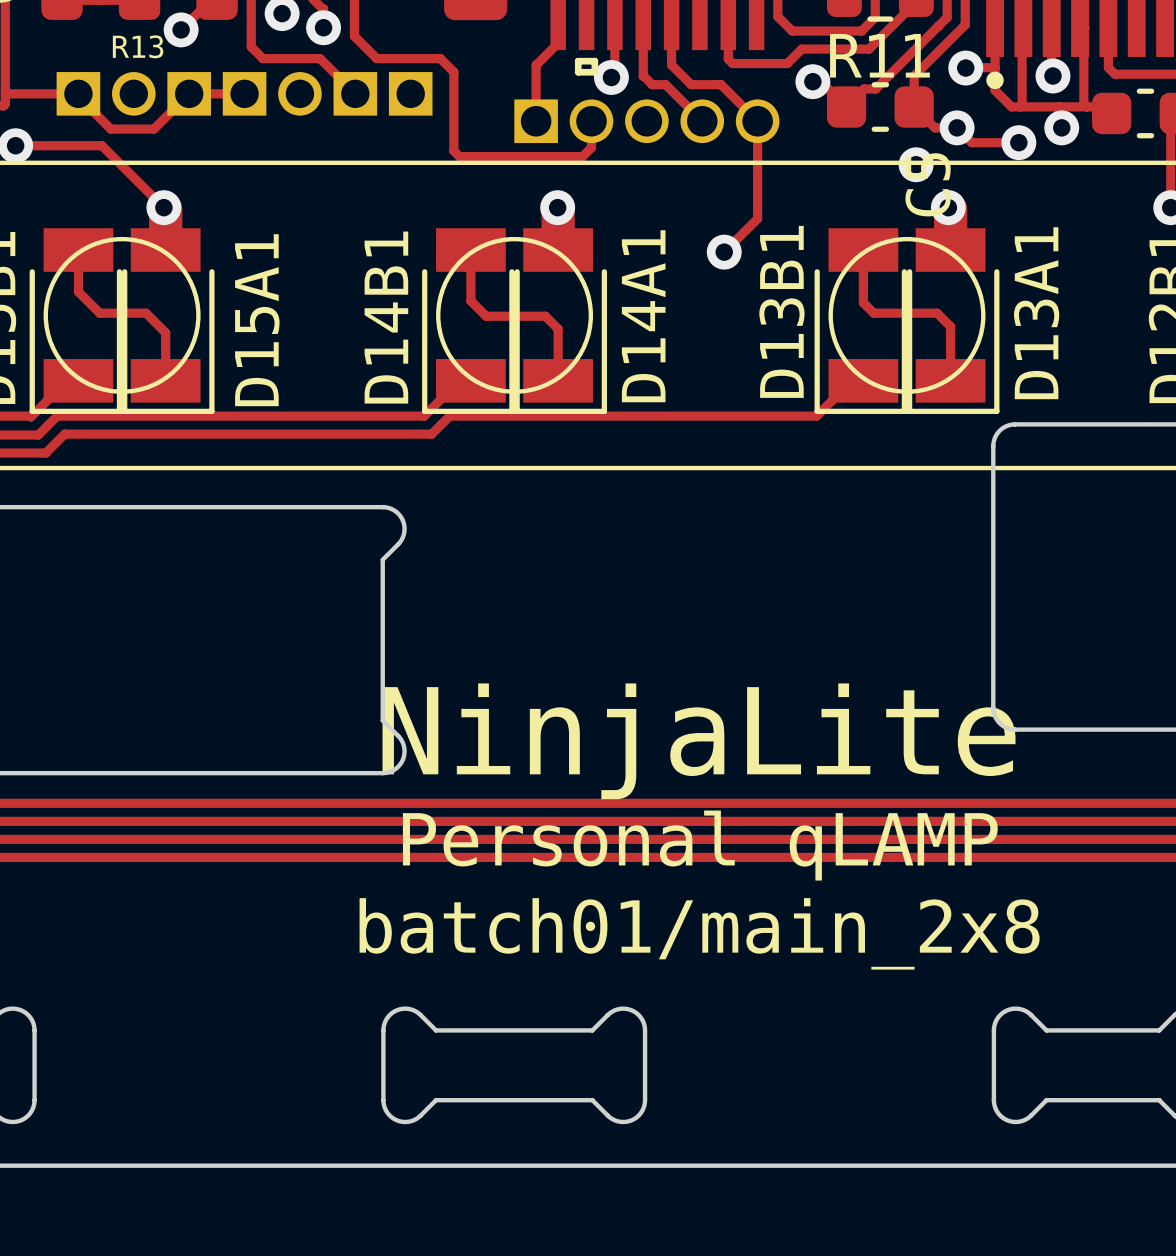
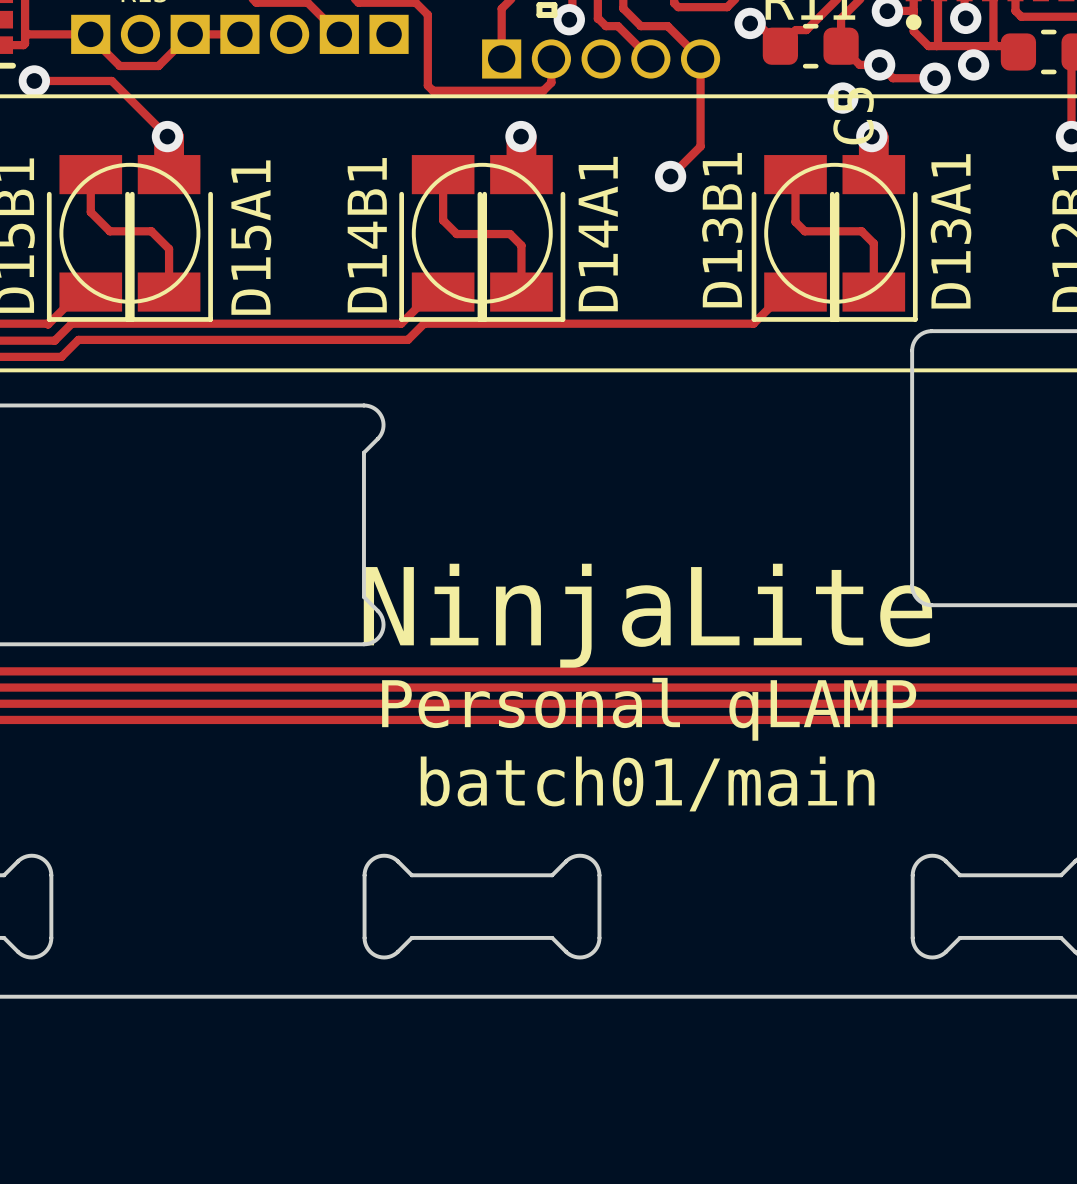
text: batch01/main_2x8 (699, 933) -> batch01/main (647, 783)

